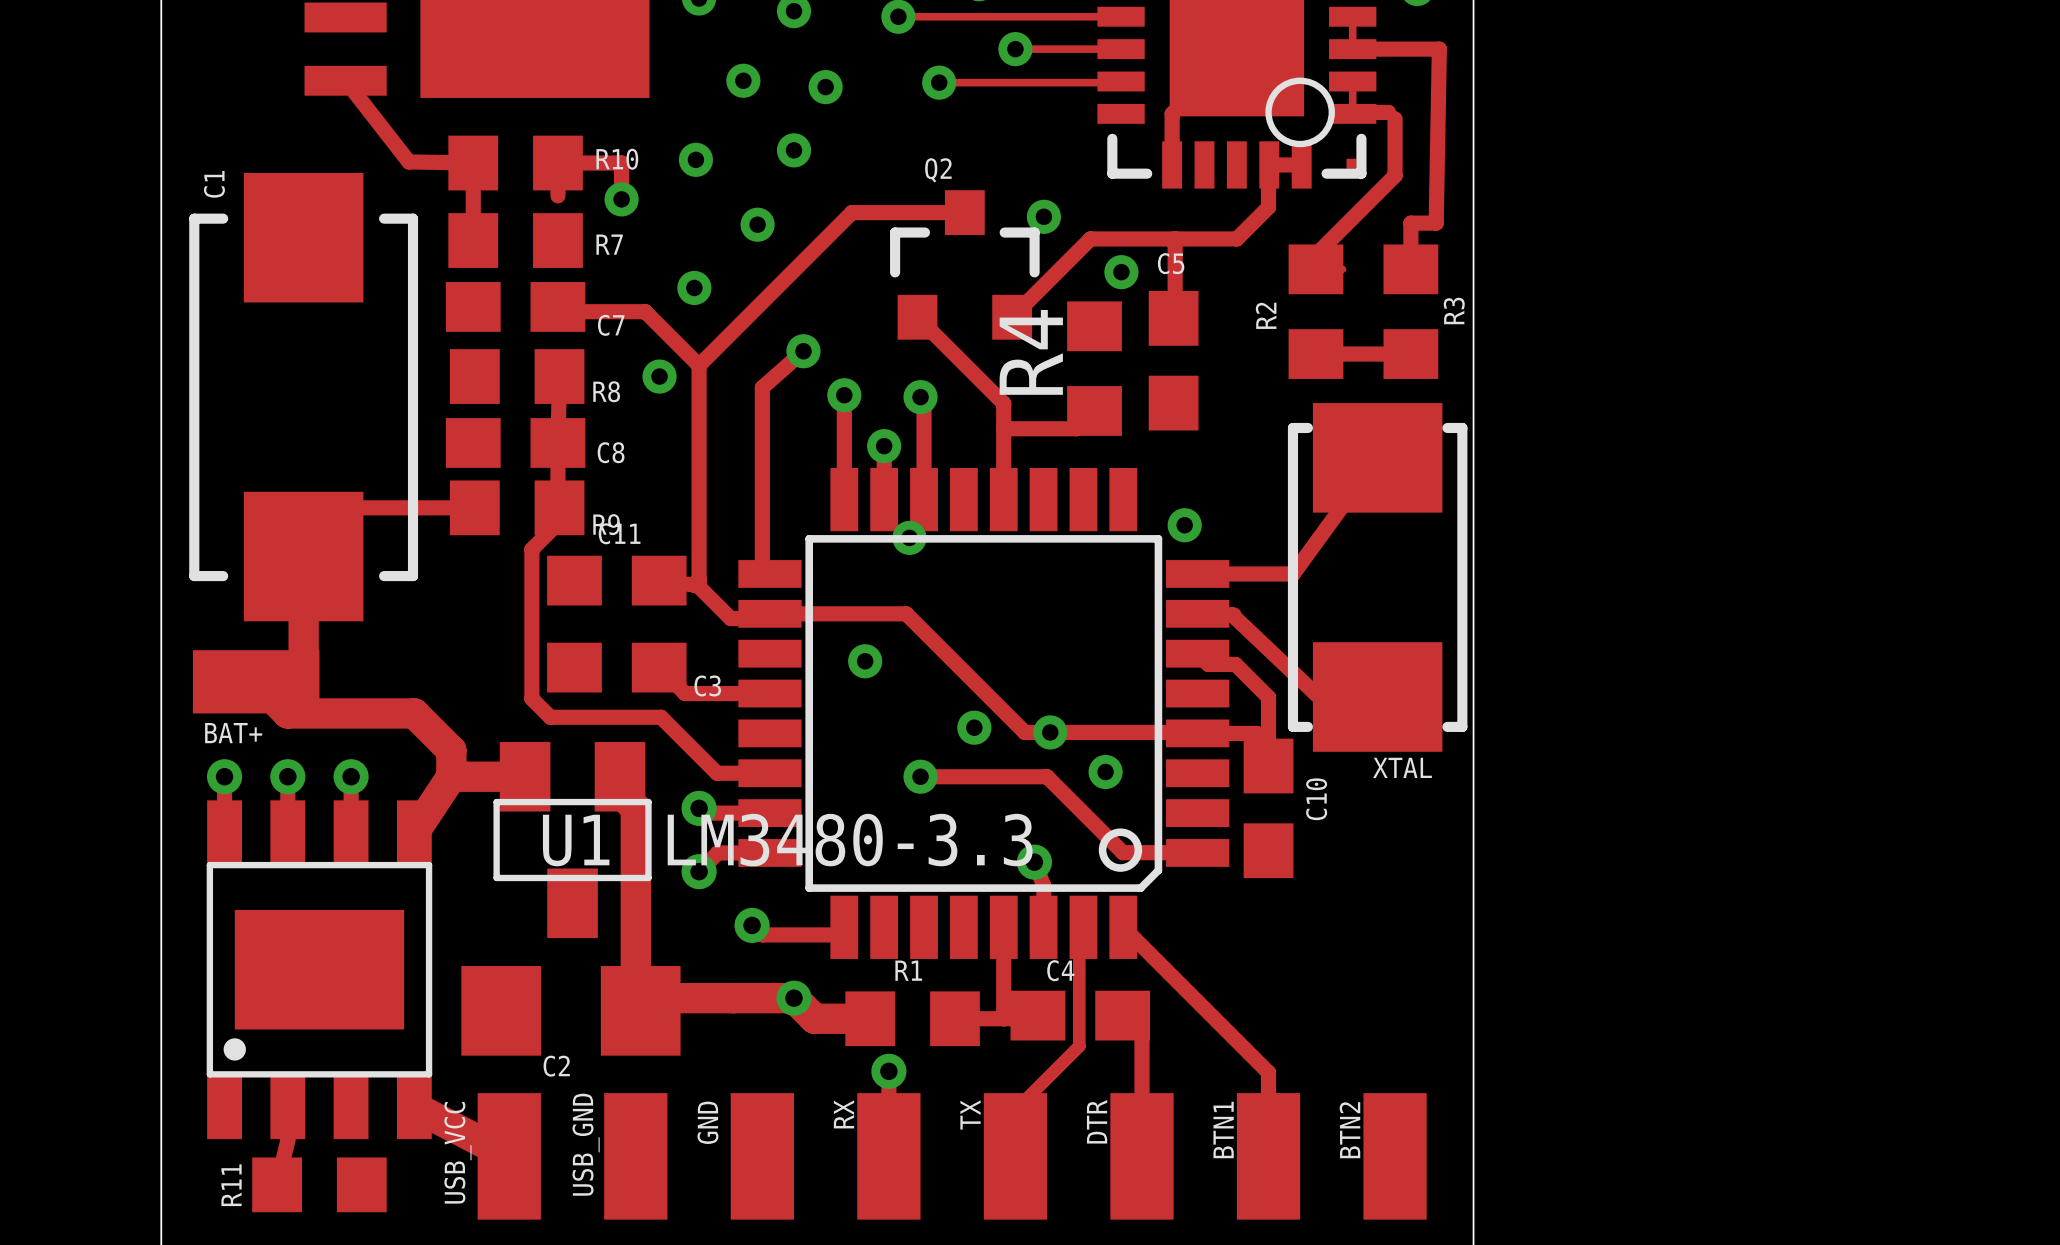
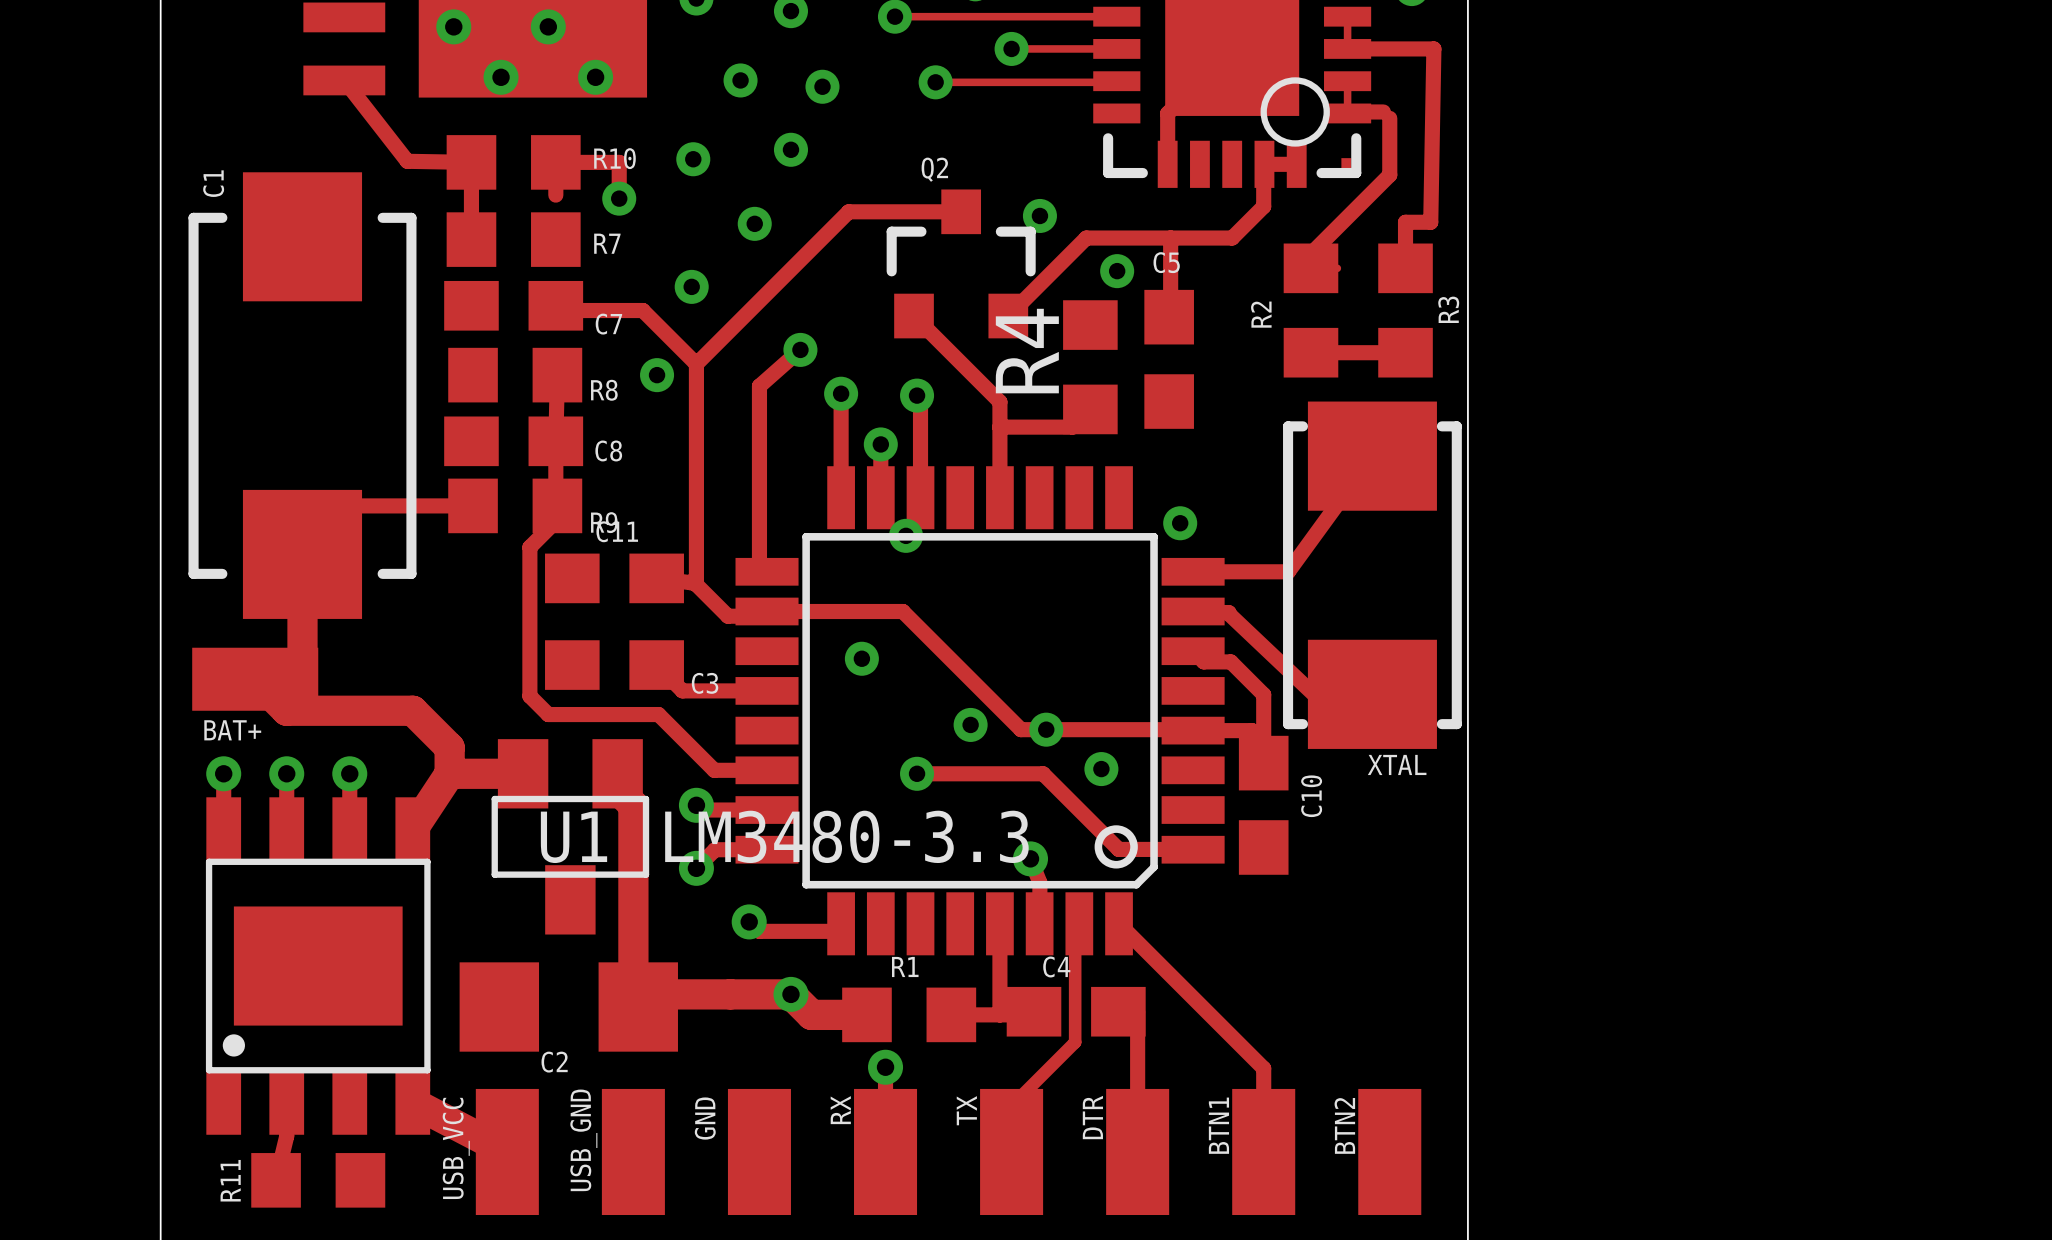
via: none -> (453, 26)
via: none -> (548, 26)
via: none -> (501, 77)
via: none -> (595, 77)

